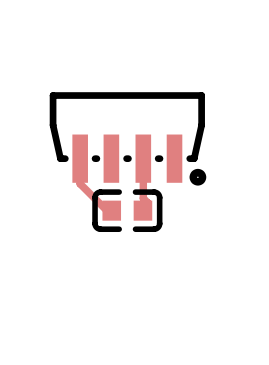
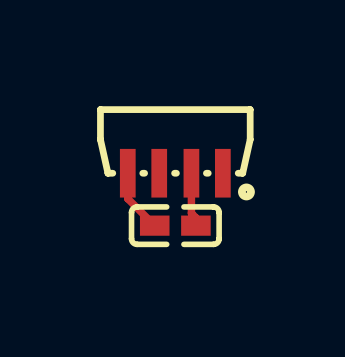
part footprint: [92, 189, 163, 233] -> [128, 204, 222, 248]

